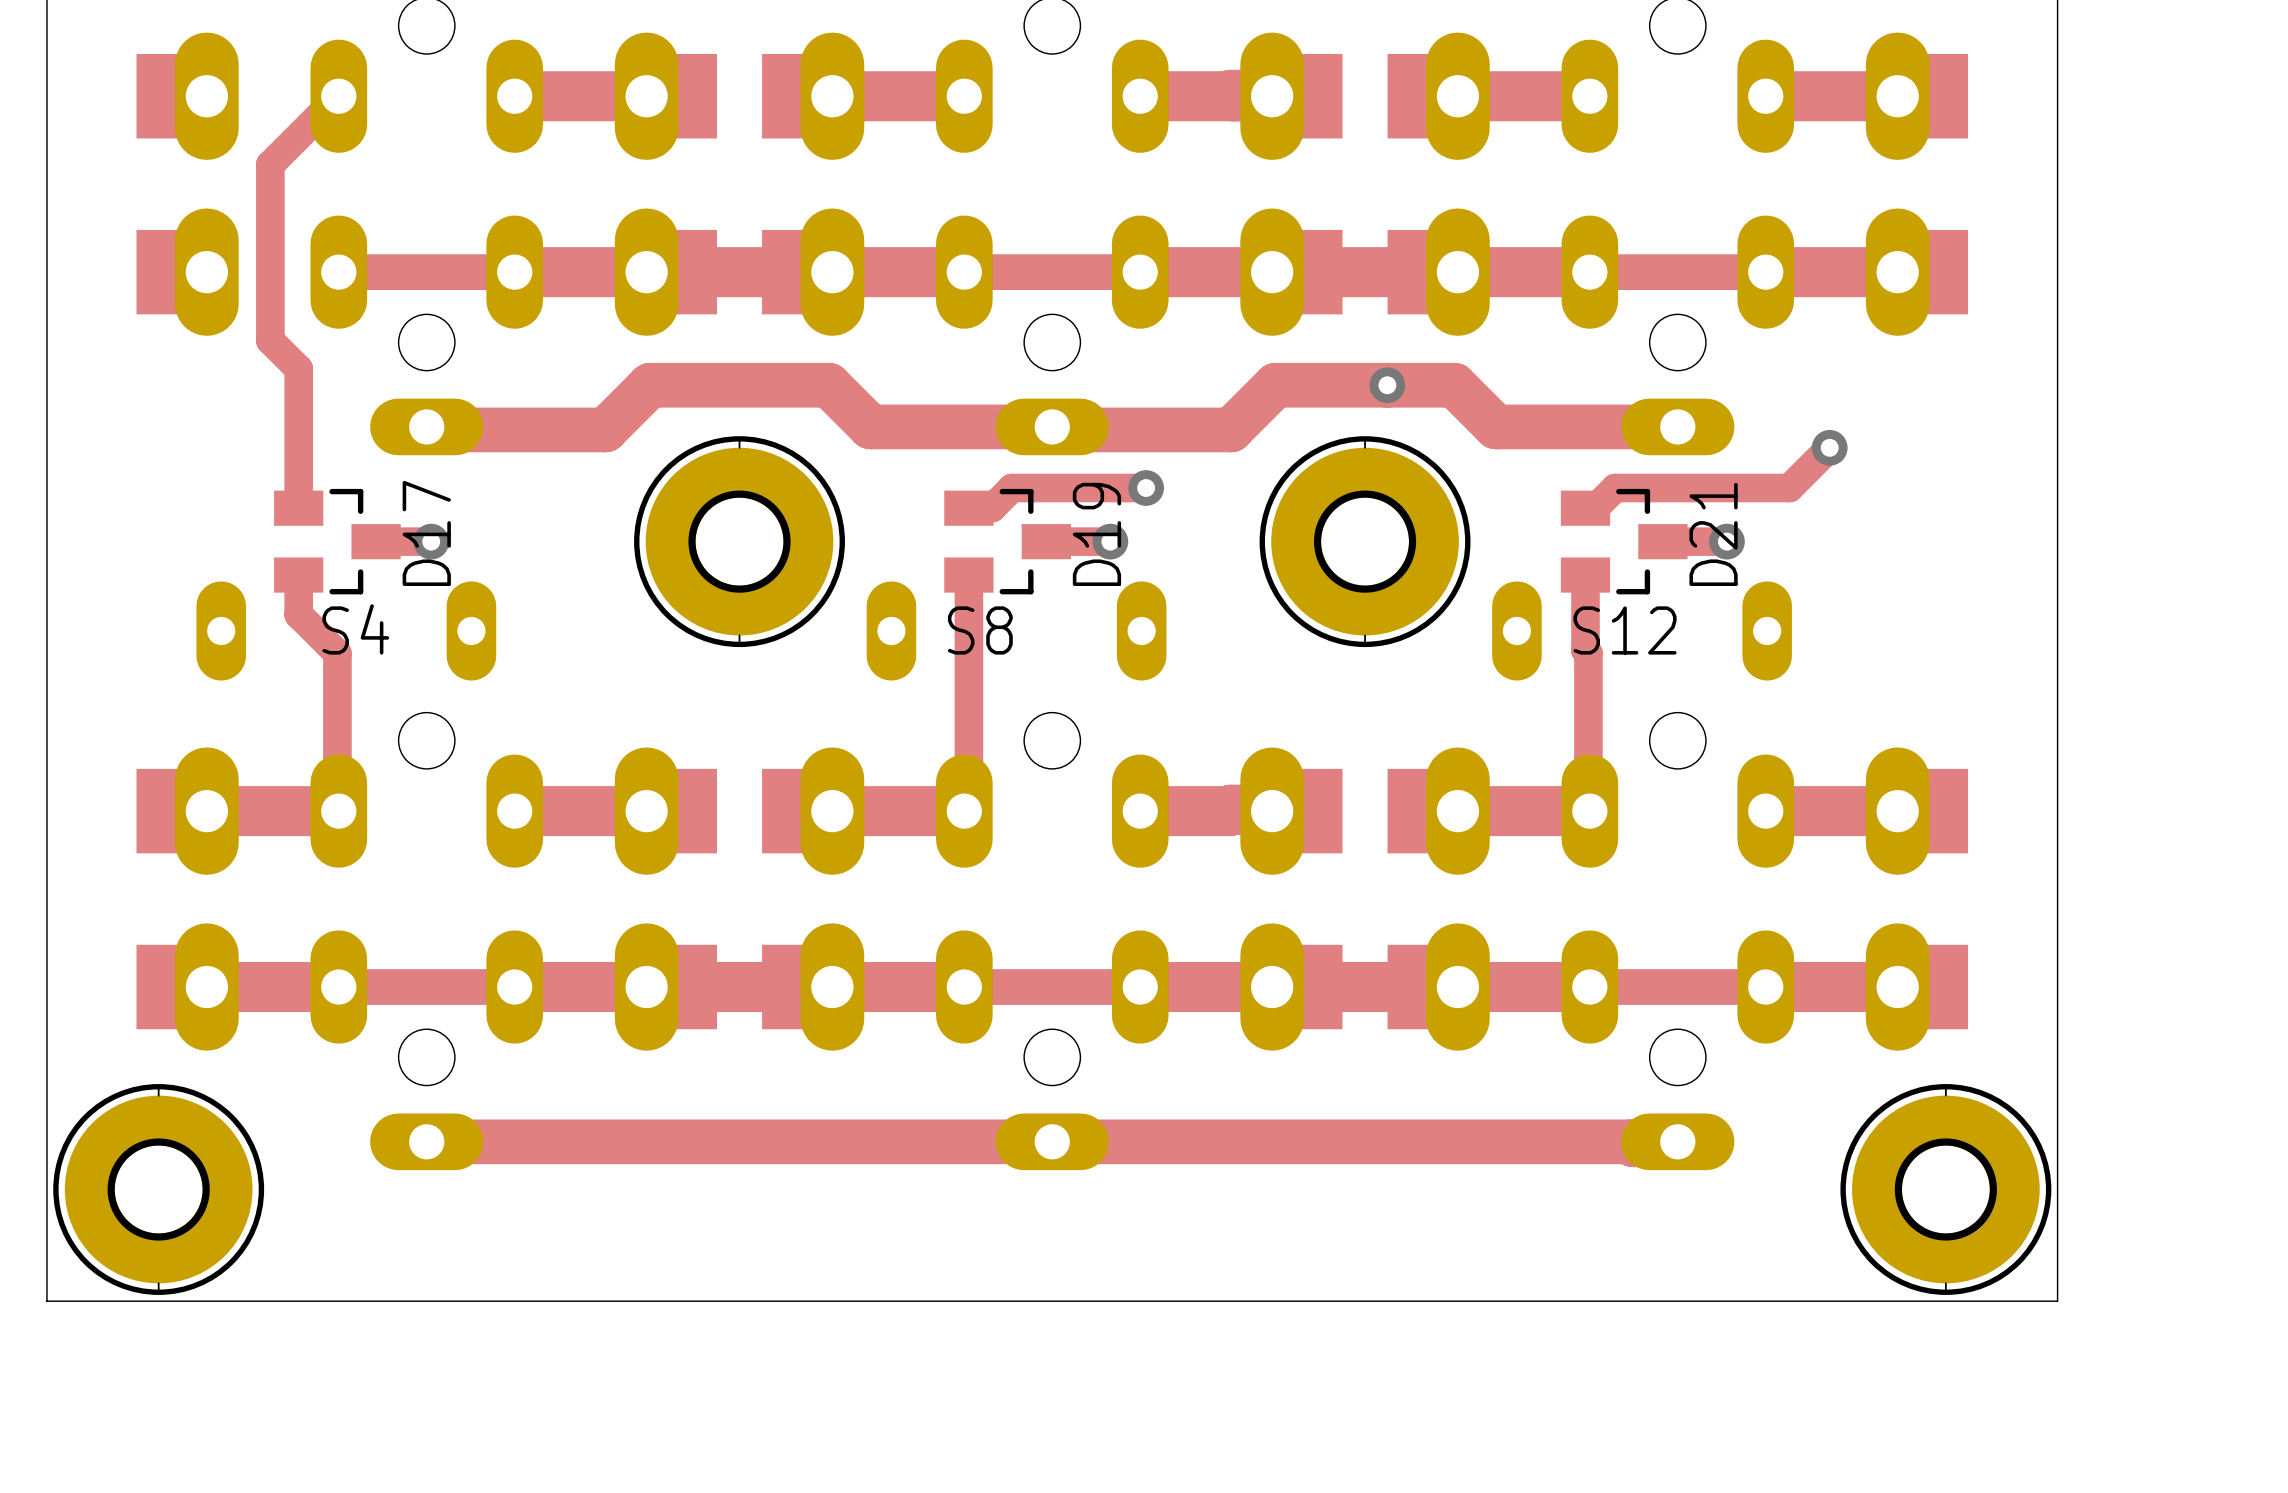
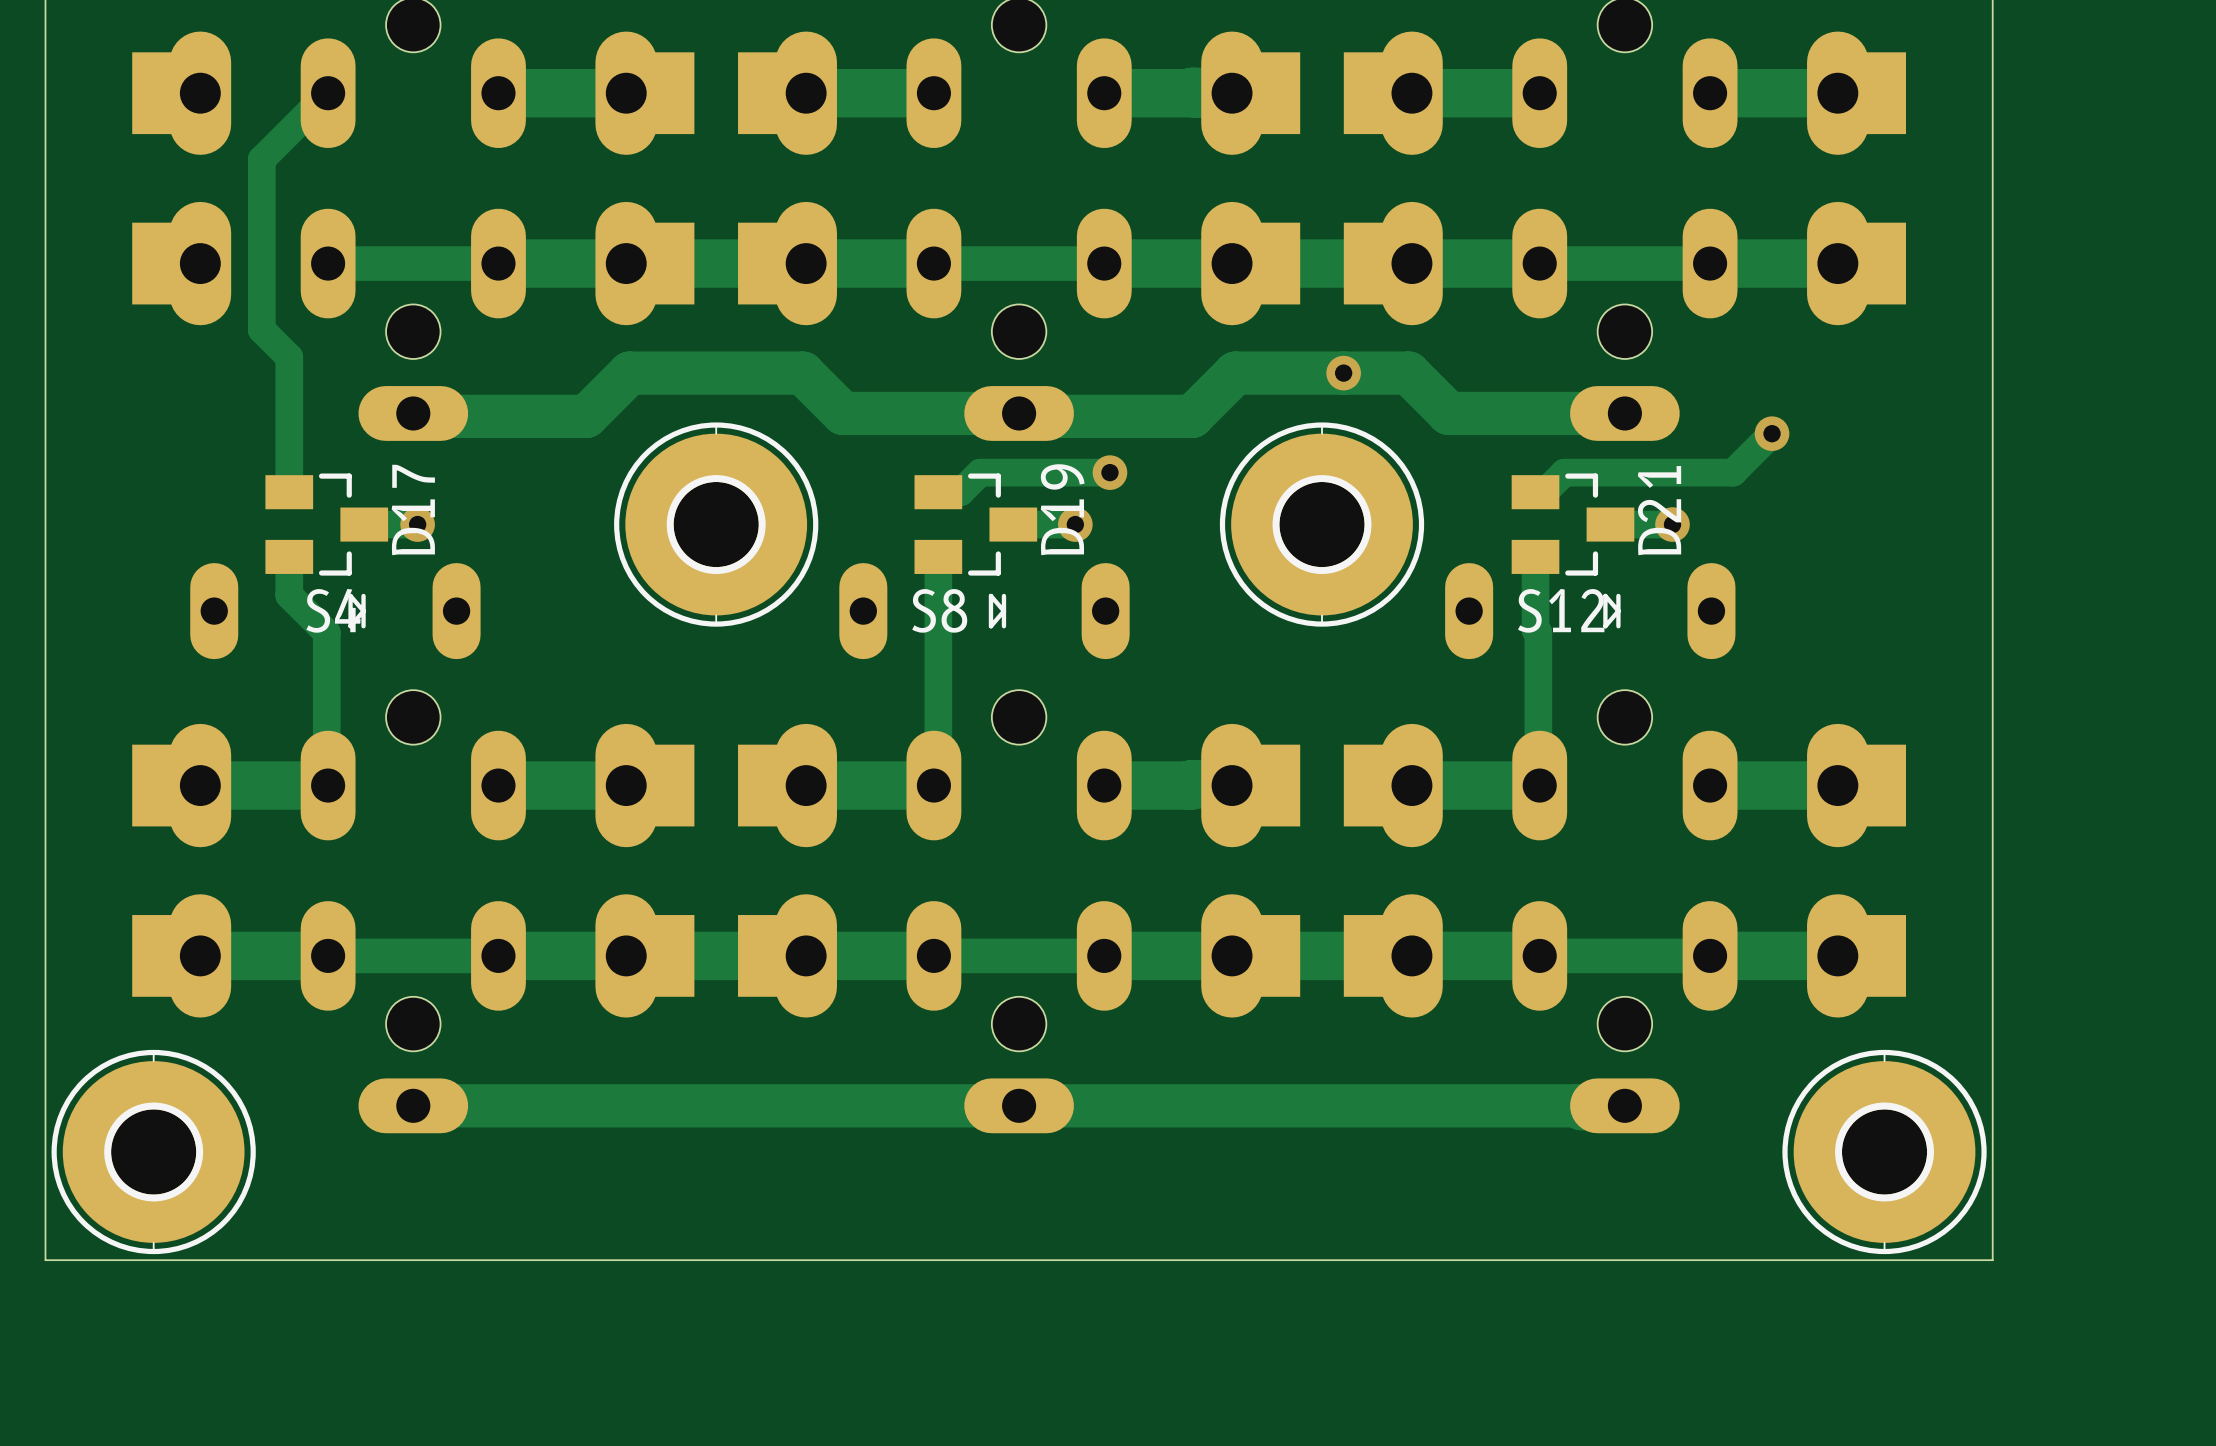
line: none -> (350, 595) (350, 626) (363, 611) (350, 595)
line: none -> (363, 595) (363, 626)
line: none -> (990, 595) (990, 626) (1003, 611) (990, 595)
line: none -> (1003, 595) (1003, 626)
line: none -> (1605, 595) (1605, 626) (1618, 611) (1605, 595)
line: none -> (1618, 595) (1618, 626)

